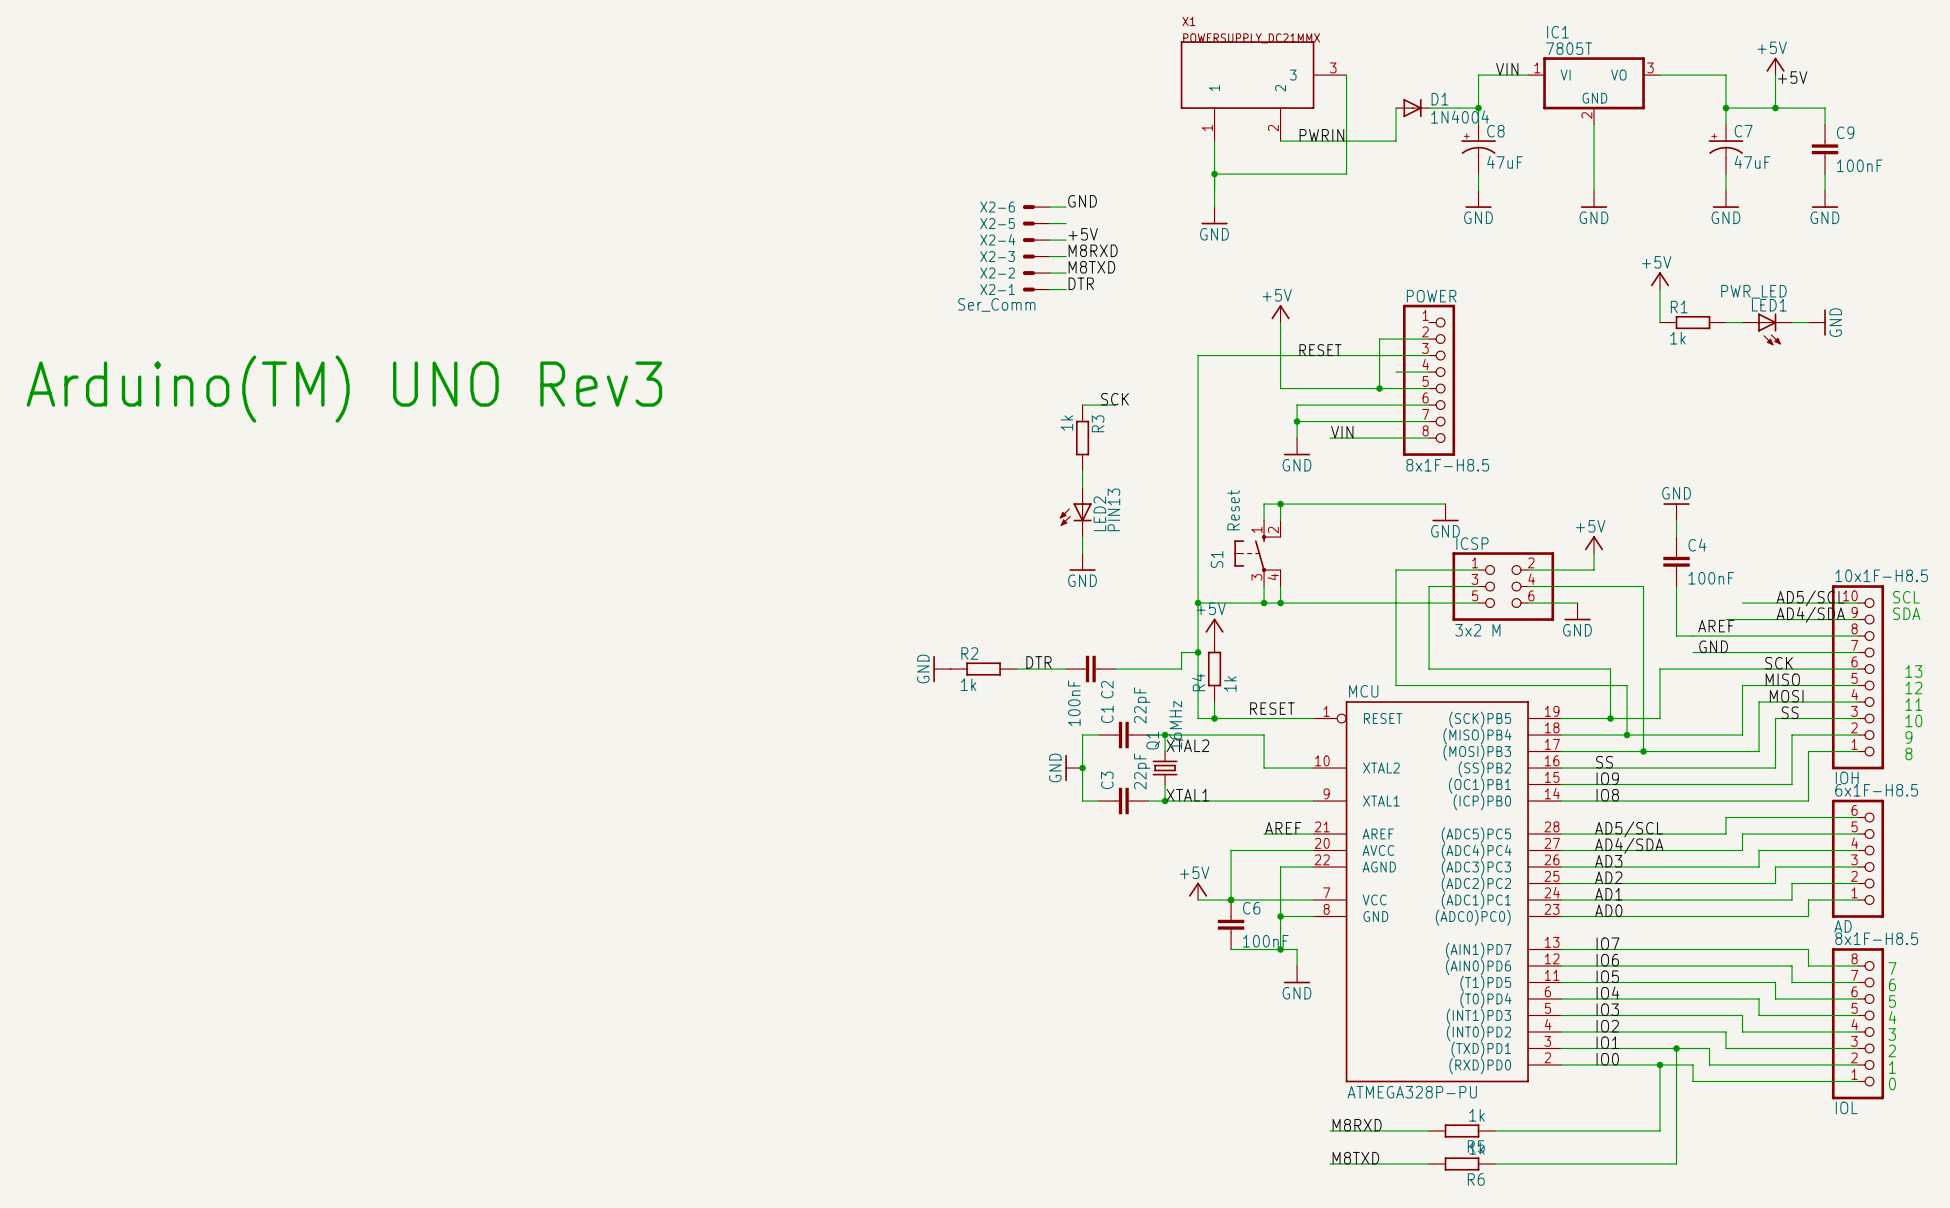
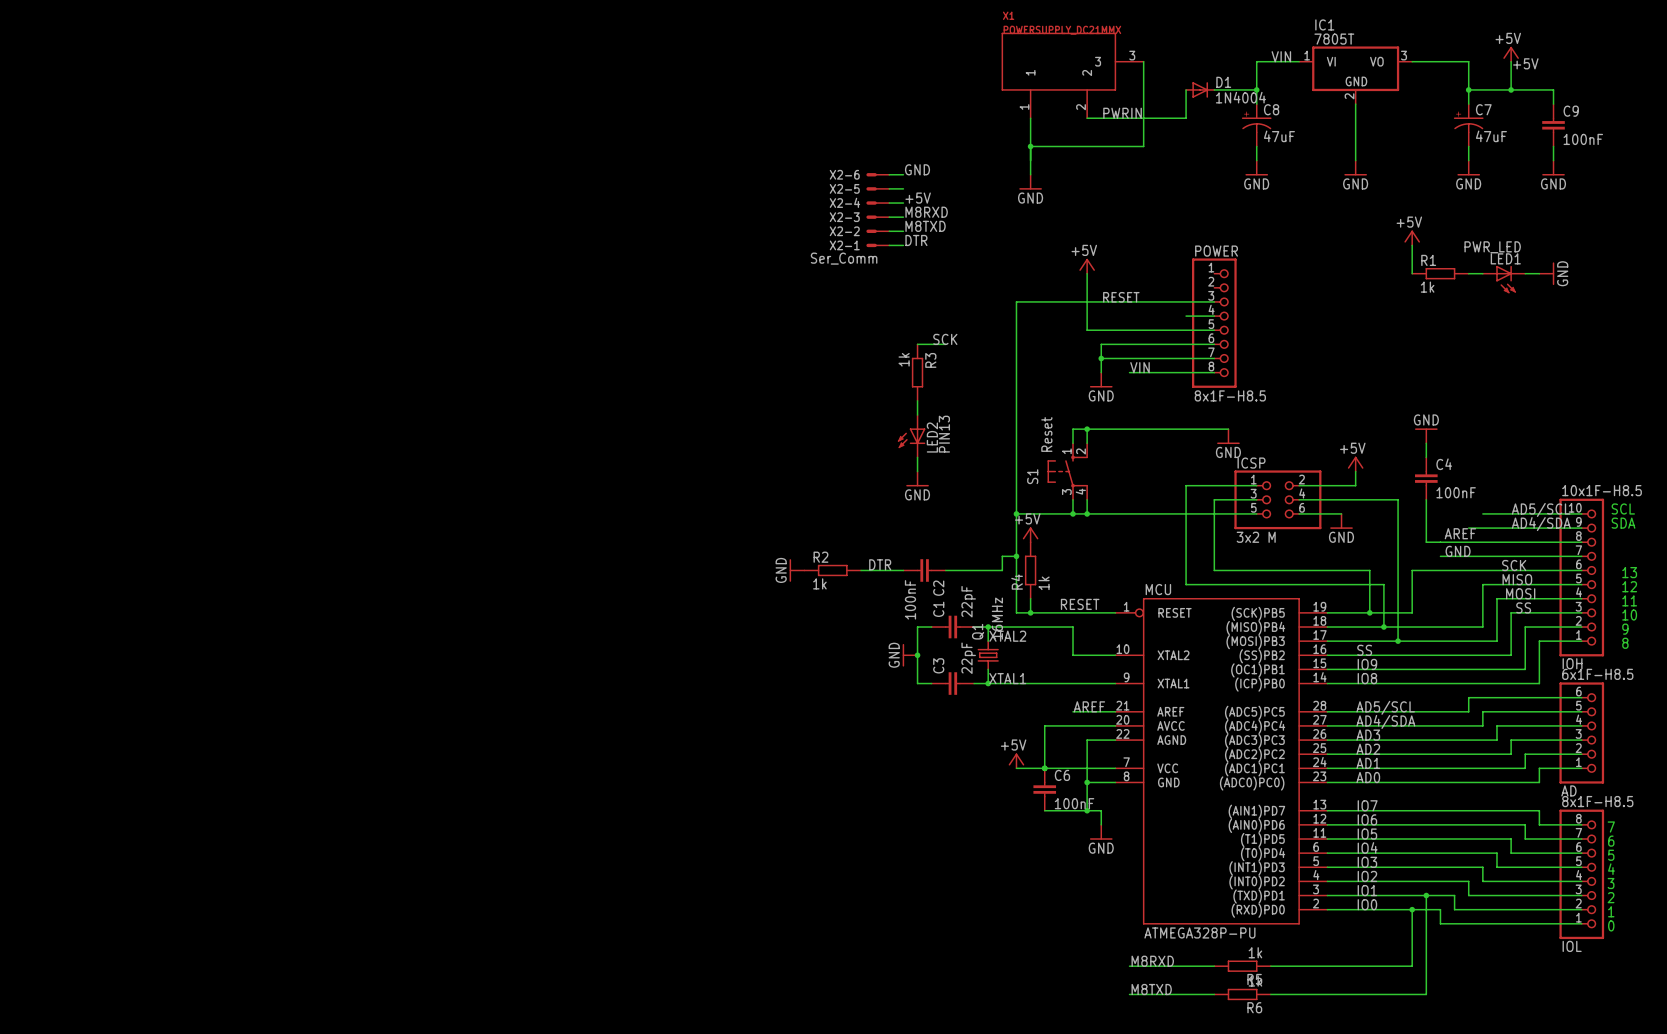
wire: (1429, 339) (1379, 339) (1379, 388) -> none
junction: (1379, 388) -> none
text: Arduino(TM) UNO Rev3 (344, 389) -> none

